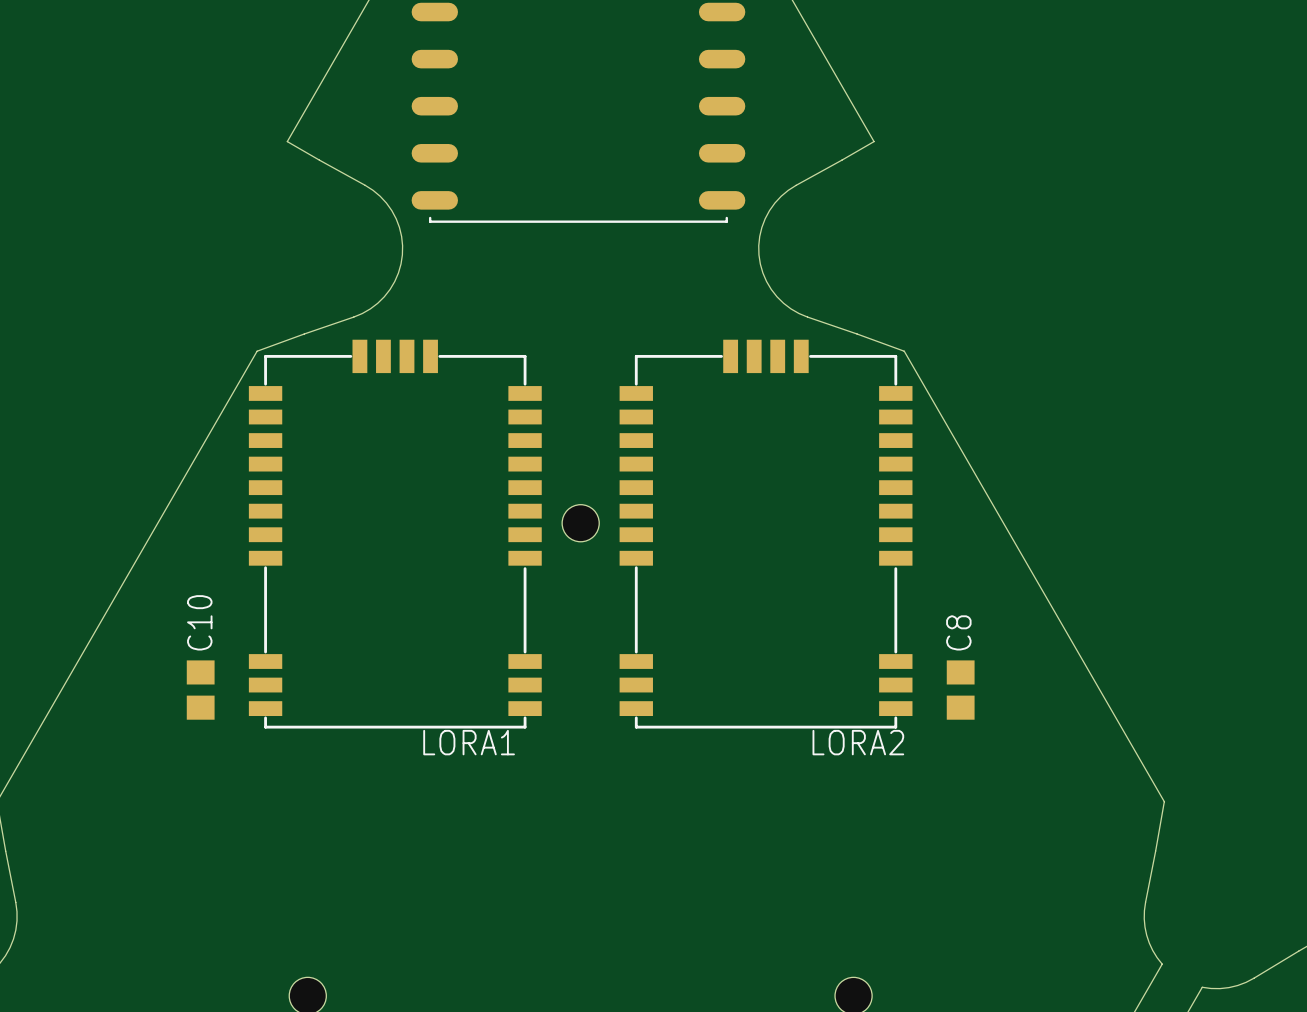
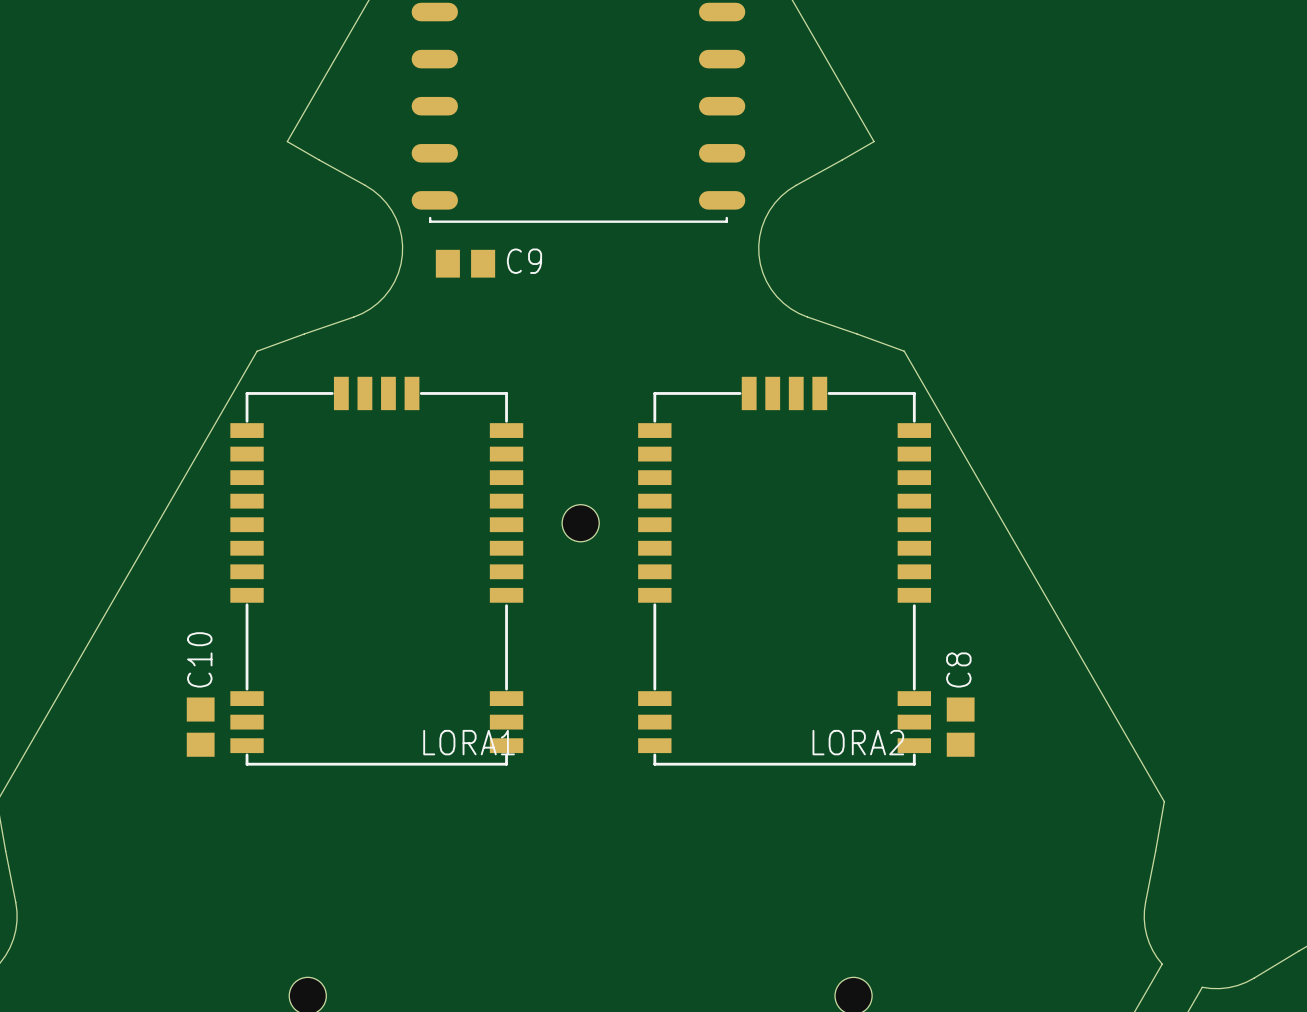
C9: none -> (465, 263)
part position: (395, 534) -> (376, 571)
part position: (766, 534) -> (784, 571)
C10 position: (200, 690) -> (200, 727)
C8 position: (960, 690) -> (960, 727)

